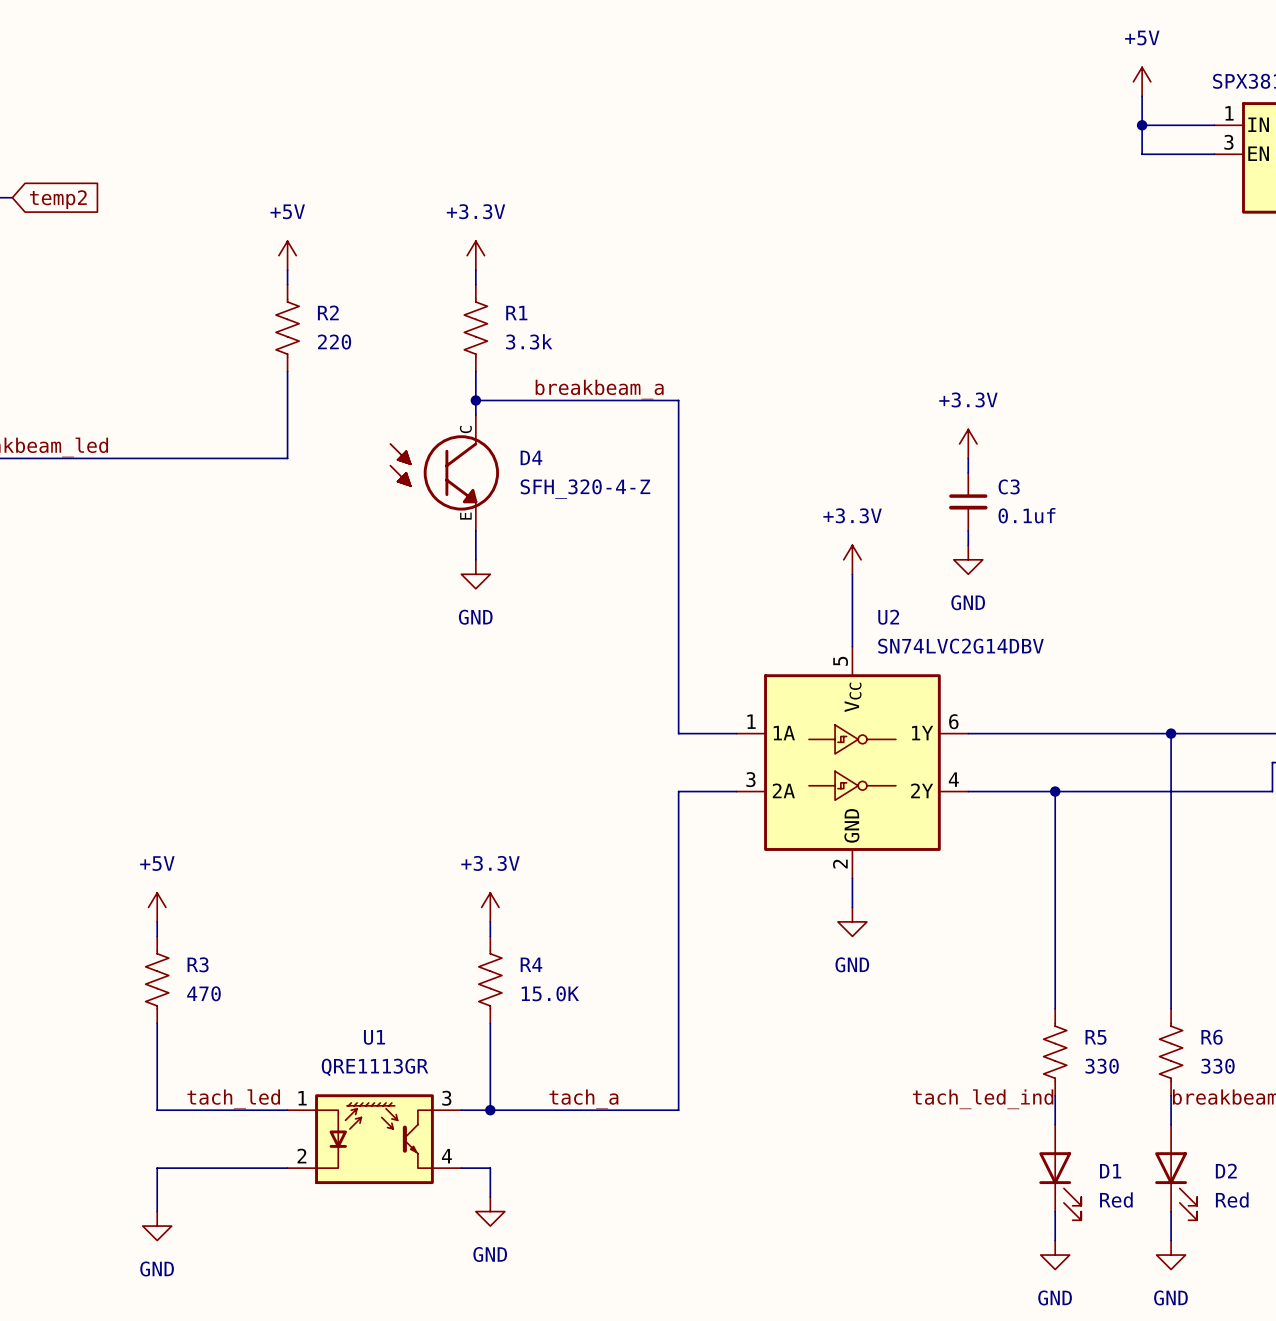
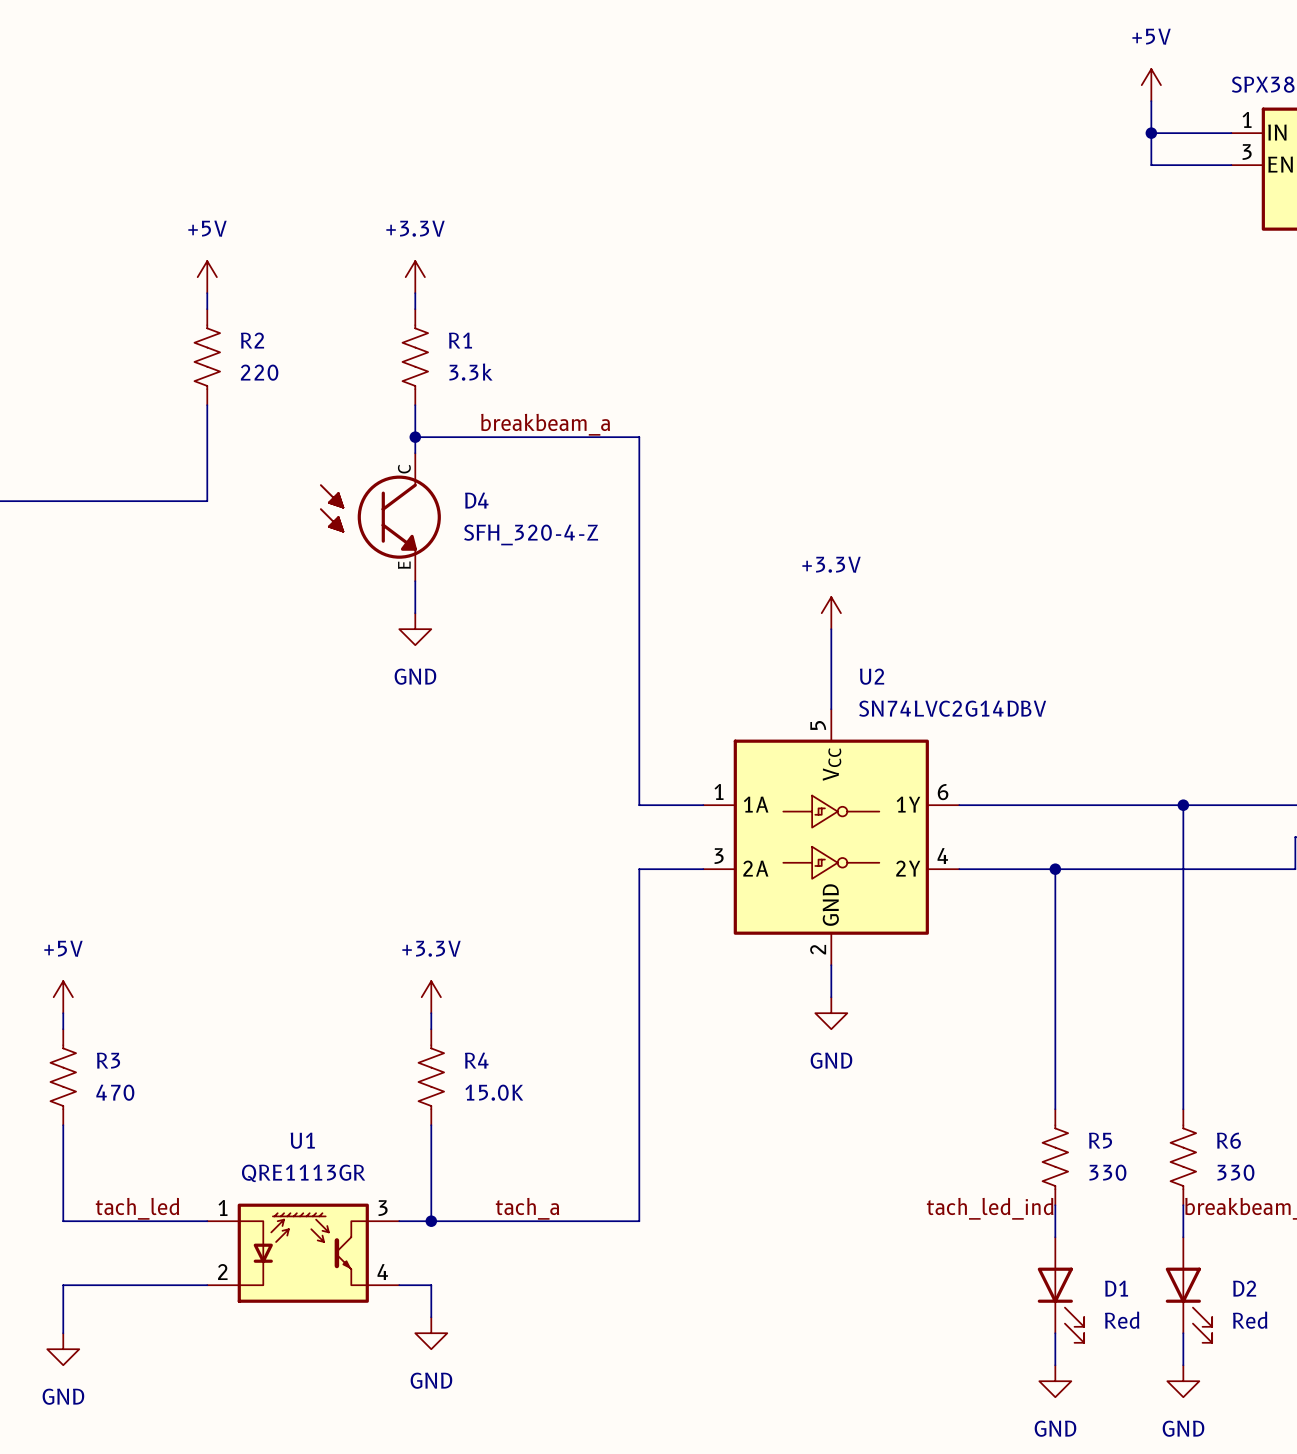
power symbol: +3.3V (968, 443) -> none
wire: (968, 458) (968, 472) -> none
C3: 0.1uf (968, 501) -> none
wire: (968, 530) (968, 545) -> none
power symbol: GND (968, 559) -> none

